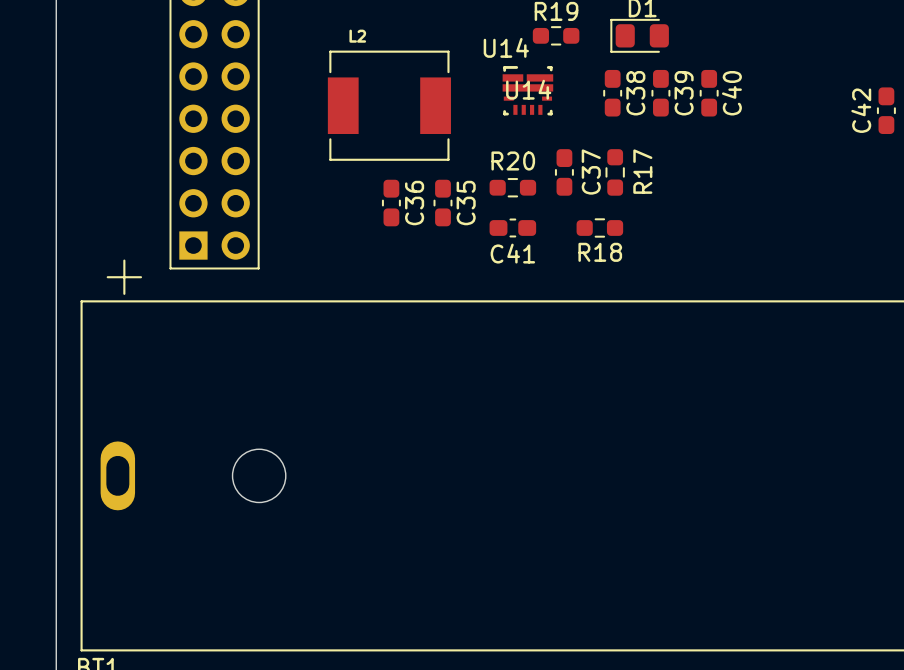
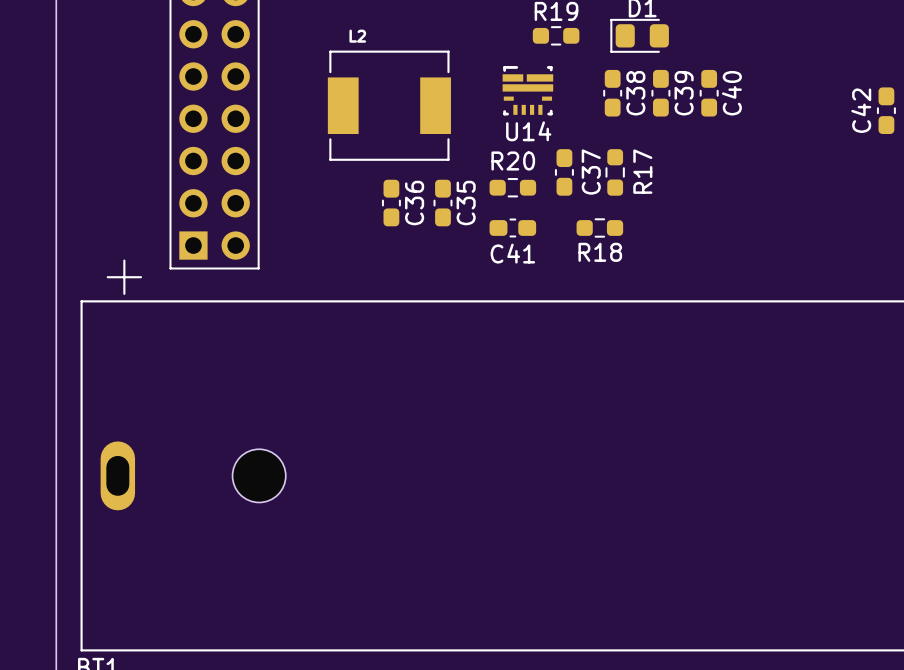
U14 text position: U14 (506, 47) -> U14 (528, 131)
U14 name: U14 (528, 89) -> none

